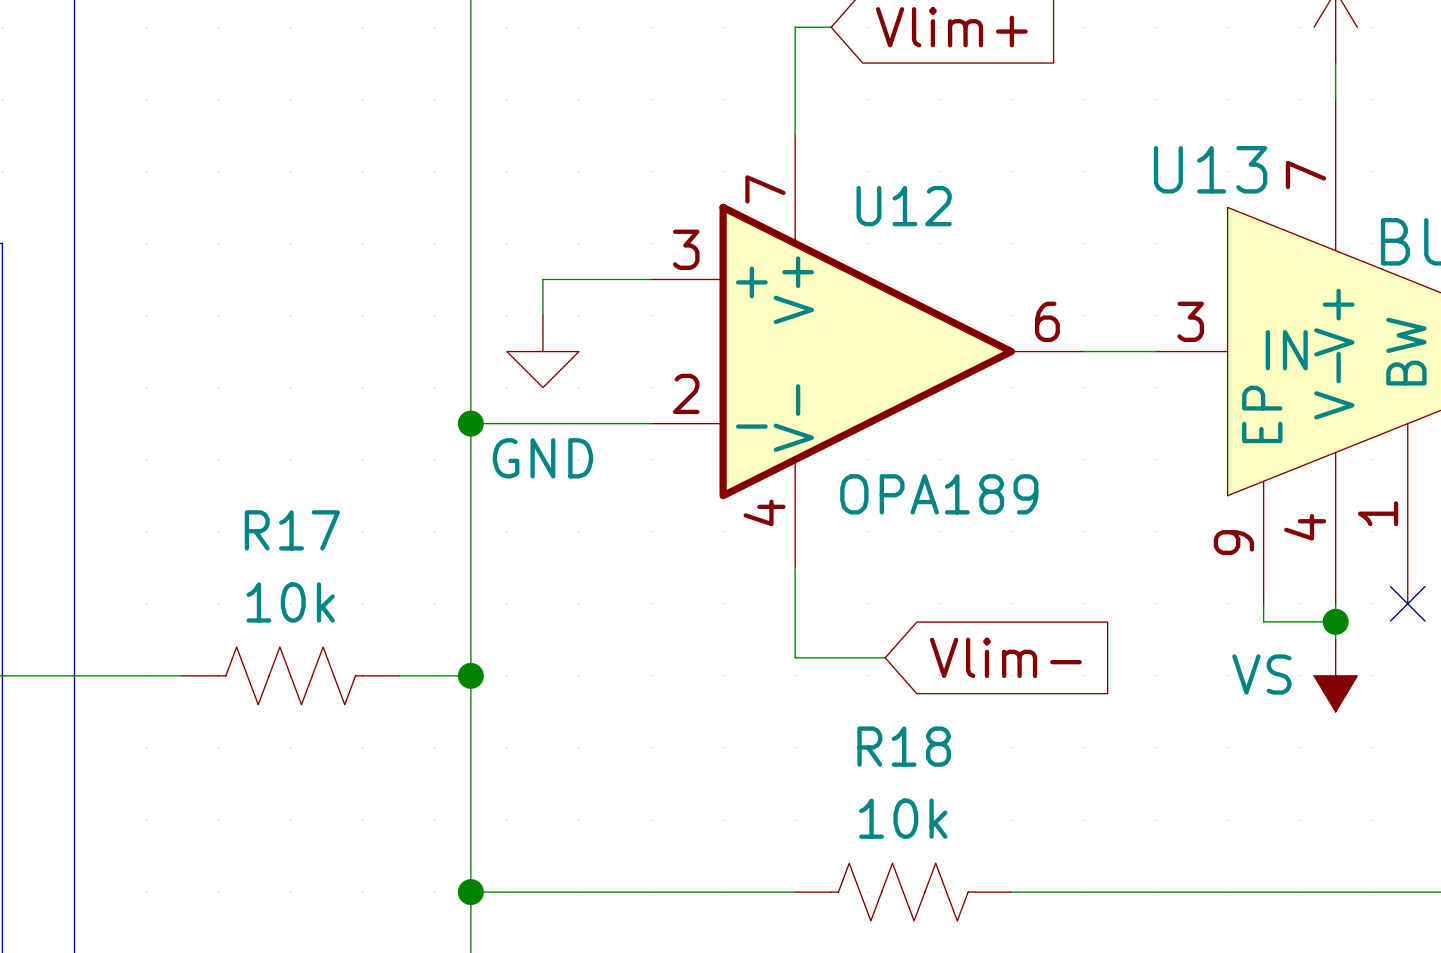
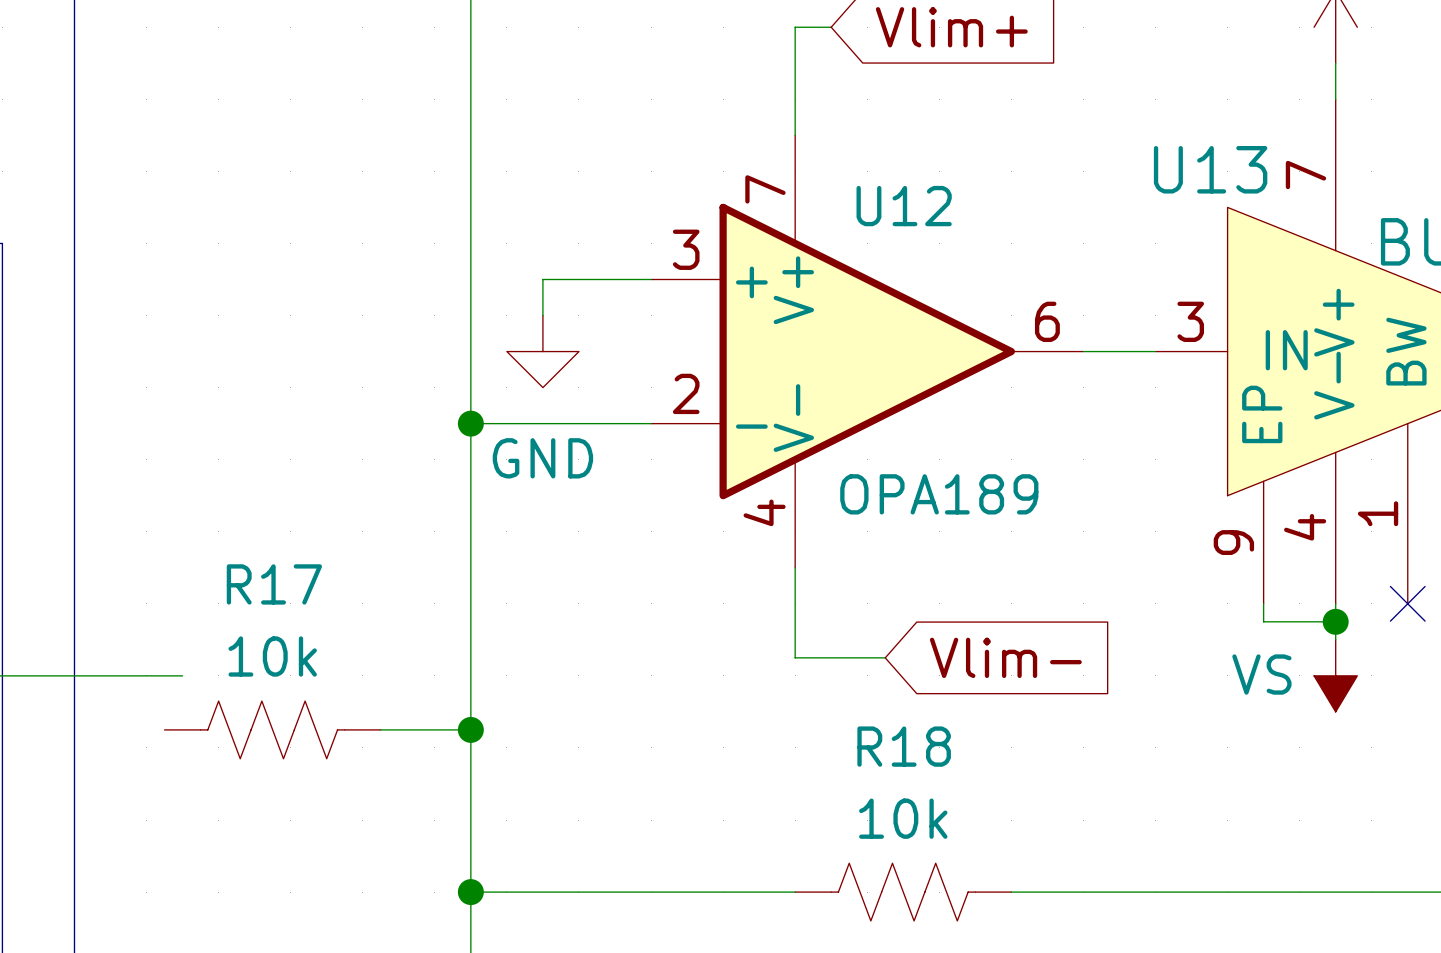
R17 position: (290, 675) -> (272, 729)
wire: (398, 675) (470, 675) -> none
junction position: (470, 675) -> (470, 729)
wire: none -> (380, 729) (470, 729)

